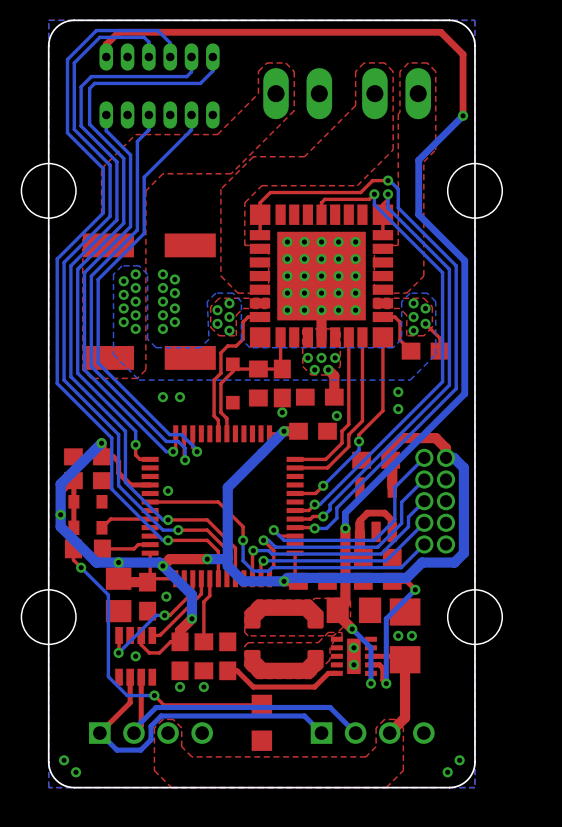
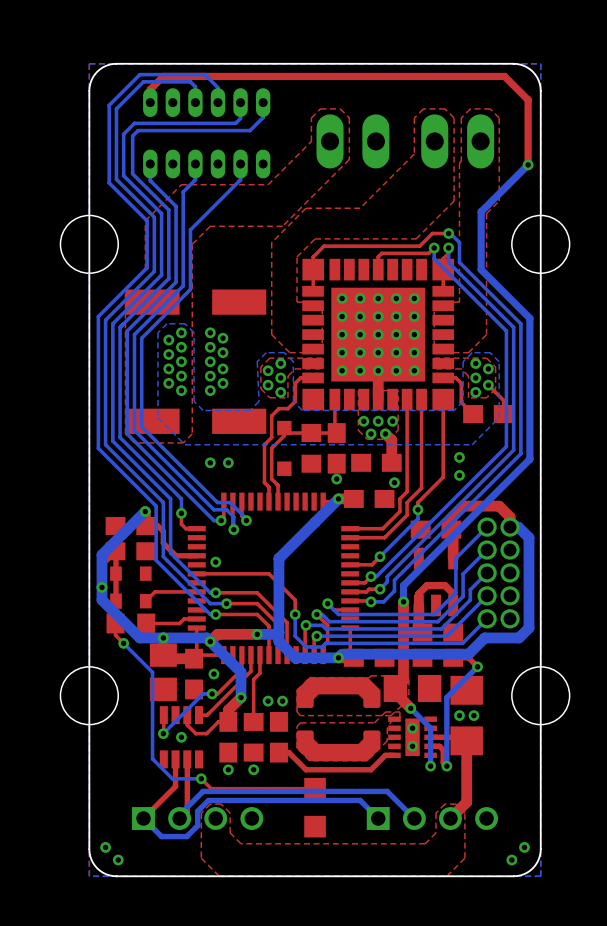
via: none -> (268, 701)
via: none -> (282, 701)

